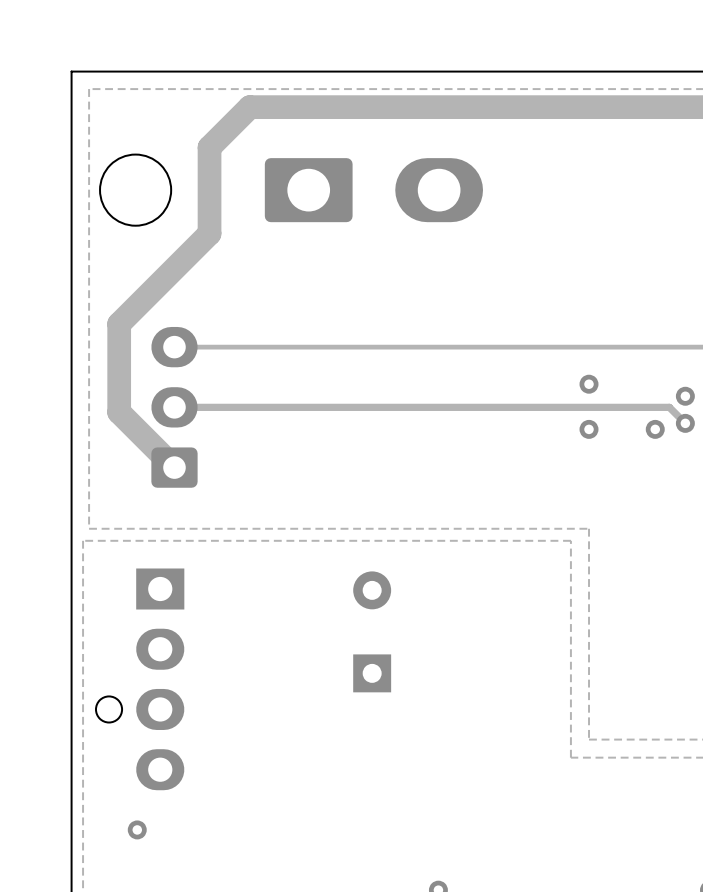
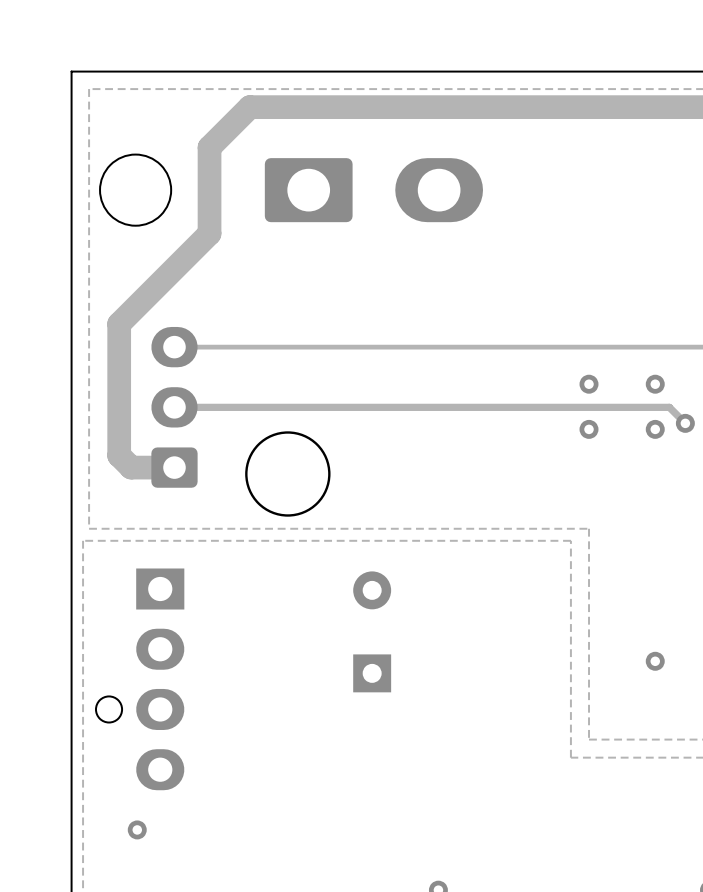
via position: (685, 396) -> (655, 384)
track: (119, 412) (174, 467) -> (119, 412) (119, 455) (131, 467) (174, 467)
round board edge: none -> [245, 431, 331, 517]
via: none -> (655, 661)

